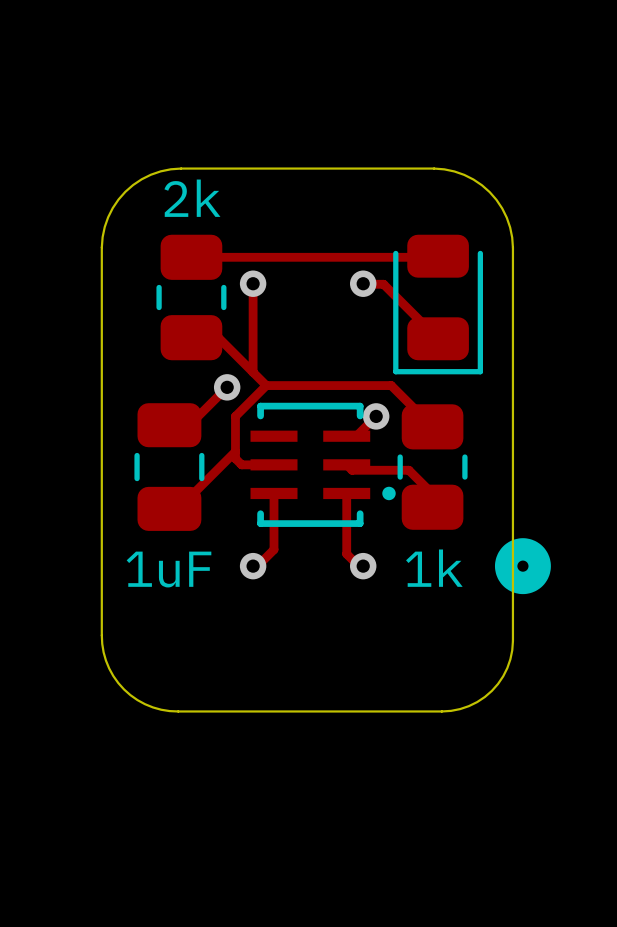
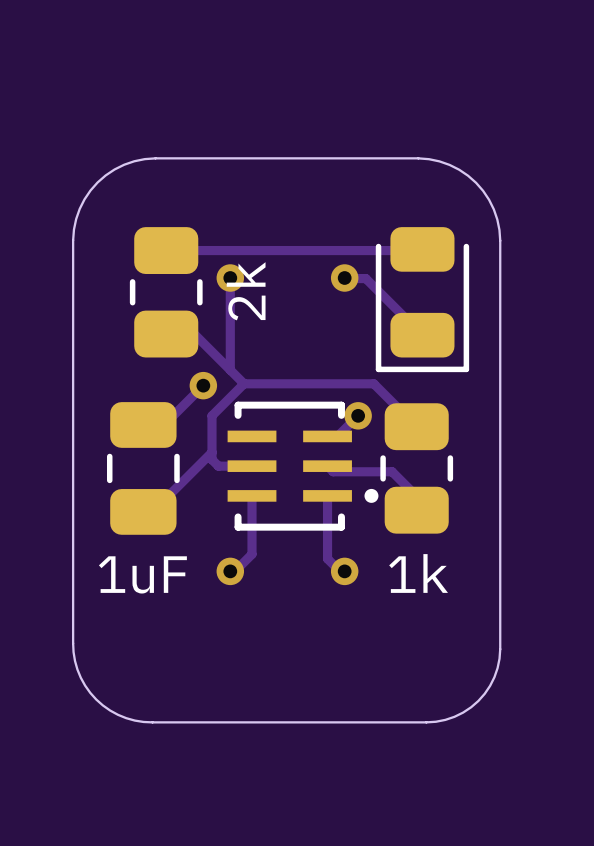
part value rotation: 0° (192, 198) -> 90° counterclockwise (246, 291)
part value position: 2k (192, 198) -> 2k (246, 291)
part: (522, 566) -> none

